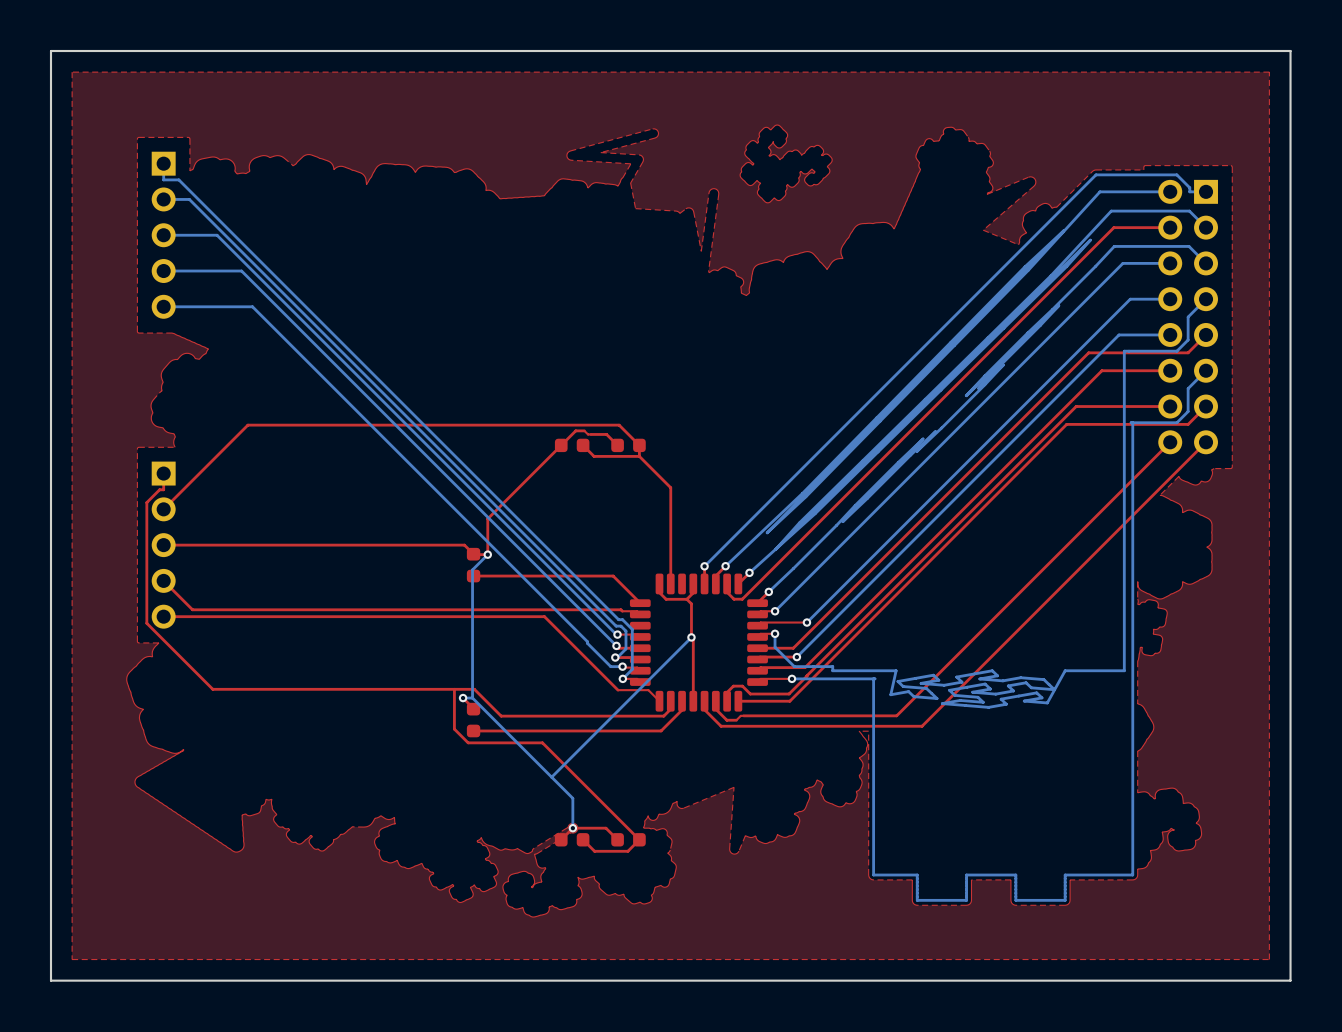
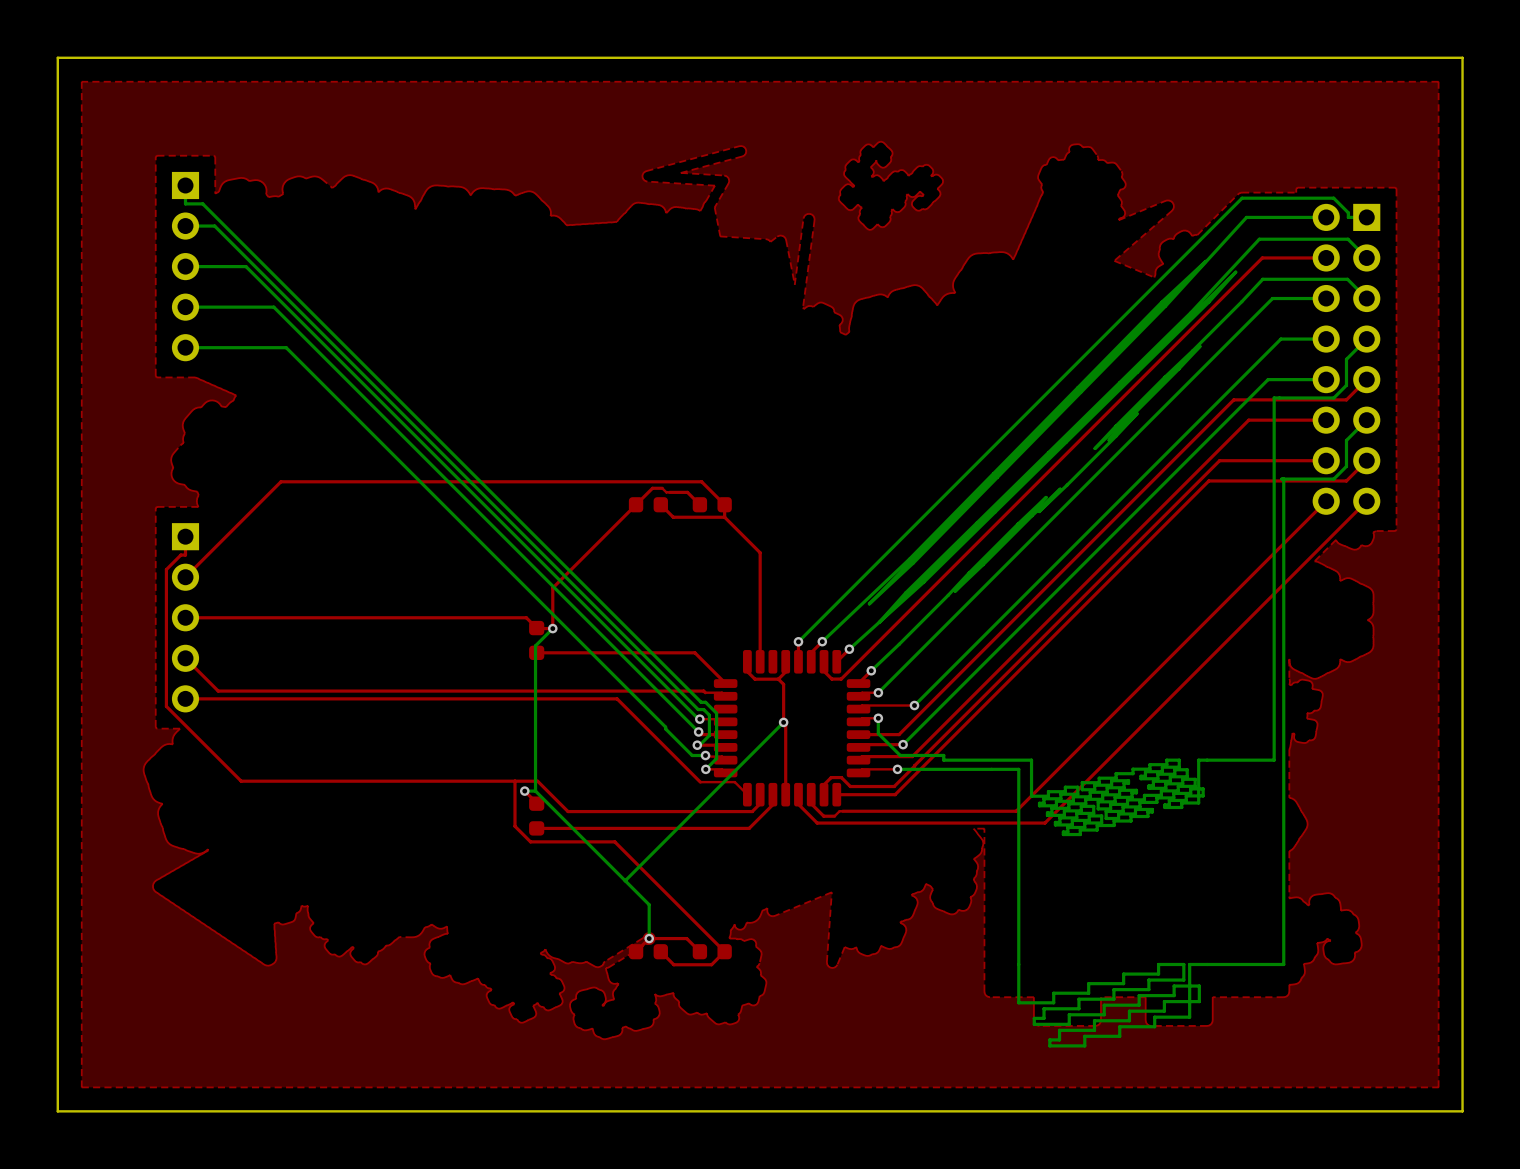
bottom track: (1065, 670) (1047, 702) (1024, 701) (1042, 697) (1036, 692) (1001, 699) (1006, 704) (988, 707) (942, 703) (960, 700) (983, 702) (977, 697) (954, 695) (949, 690) (985, 684) (990, 689) (972, 692) (995, 694) (1013, 690) (1008, 685) (1026, 682) (1031, 687) (1054, 689) (1043, 679) (1020, 677) (1002, 680) (979, 678) (997, 675) (992, 670) (956, 677) (962, 682) (944, 685) (921, 683) (938, 680) (933, 675) (897, 681) (903, 686) (926, 688) (937, 698) (913, 696) (908, 691) (890, 694) (896, 670) -> (1207, 760) (1198, 760) (1198, 802) (1181, 802) (1181, 807) (1164, 807) (1164, 804) (1169, 804) (1169, 800) (1186, 800) (1186, 795) (1203, 795) (1203, 788) (1190, 788) (1190, 793) (1173, 793) (1173, 797) (1156, 797) (1156, 802) (1139, 802) (1139, 806) (1123, 806) (1123, 811) (1106, 811) (1106, 818) (1118, 818) (1118, 813) (1135, 813) (1135, 809) (1152, 809) (1152, 812) (1147, 812) (1147, 816) (1131, 816) (1131, 821) (1114, 821) (1114, 825) (1097, 825) (1097, 830) (1080, 830) (1080, 834) (1063, 834) (1063, 832) (1067, 832) (1067, 827) (1084, 827) (1084, 822) (1101, 822) (1101, 815) (1089, 815) (1089, 820) (1072, 820) (1072, 824) (1055, 824) (1055, 822) (1059, 822) (1059, 817) (1076, 817) (1076, 813) (1093, 813) (1093, 806) (1081, 806) (1081, 810) (1064, 810) (1064, 815) (1047, 815) (1047, 812) (1051, 812) (1051, 808) (1068, 808) (1068, 803) (1085, 803) (1085, 799) (1102, 799) (1102, 794) (1119, 794) (1119, 790) (1136, 790) (1136, 792) (1132, 792) (1132, 797) (1115, 797) (1115, 801) (1098, 801) (1098, 808) (1110, 808) (1110, 804) (1127, 804) (1127, 799) (1144, 799) (1144, 795) (1161, 795) (1161, 790) (1178, 790) (1178, 786) (1195, 786) (1195, 779) (1182, 779) (1182, 783) (1165, 783) (1165, 788) (1148, 788) (1148, 785) (1153, 785) (1153, 781) (1170, 781) (1170, 776) (1187, 776) (1187, 769) (1174, 769) (1174, 774) (1157, 774) (1157, 778) (1140, 778) (1140, 776) (1145, 776) (1145, 771) (1162, 771) (1162, 767) (1179, 767) (1179, 760) (1166, 760) (1166, 764) (1149, 764) (1149, 769) (1133, 769) (1133, 773) (1116, 773) (1116, 778) (1099, 778) (1099, 782) (1082, 782) (1082, 789) (1094, 789) (1094, 785) (1111, 785) (1111, 780) (1128, 780) (1128, 783) (1124, 783) (1124, 787) (1107, 787) (1107, 792) (1090, 792) (1090, 796) (1073, 796) (1073, 801) (1056, 801) (1056, 805) (1039, 805) (1039, 803) (1043, 803) (1043, 798) (1060, 798) (1060, 794) (1077, 794) (1077, 787) (1065, 787) (1065, 791) (1048, 791) (1048, 796) (1031, 796) (1031, 760) (1015, 760)
bottom track: (873, 678) (873, 875) (917, 875) (917, 900) (966, 900) (966, 875) (1015, 875) (1015, 900) (1065, 900) (1065, 875) (1132, 875) (1132, 851) -> (991, 769) (1018, 769) (1018, 1002) (1053, 1002) (1053, 993) (1088, 993) (1088, 983) (1123, 983) (1123, 974) (1158, 974) (1158, 964) (1183, 964) (1183, 980) (1148, 980) (1148, 989) (1113, 989) (1113, 999) (1078, 999) (1078, 1008) (1044, 1008) (1044, 1018) (1034, 1018) (1034, 1024) (1069, 1024) (1069, 1014) (1104, 1014) (1104, 1005) (1139, 1005) (1139, 995) (1174, 995) (1174, 986) (1199, 986) (1199, 1001) (1164, 1001) (1164, 1011) (1129, 1011) (1129, 1020) (1094, 1020) (1094, 1030) (1059, 1030) (1059, 1039) (1049, 1039) (1049, 1045) (1084, 1045) (1084, 1036) (1119, 1036) (1119, 1026) (1154, 1026) (1154, 1017) (1189, 1017) (1189, 964) (1283, 964)

